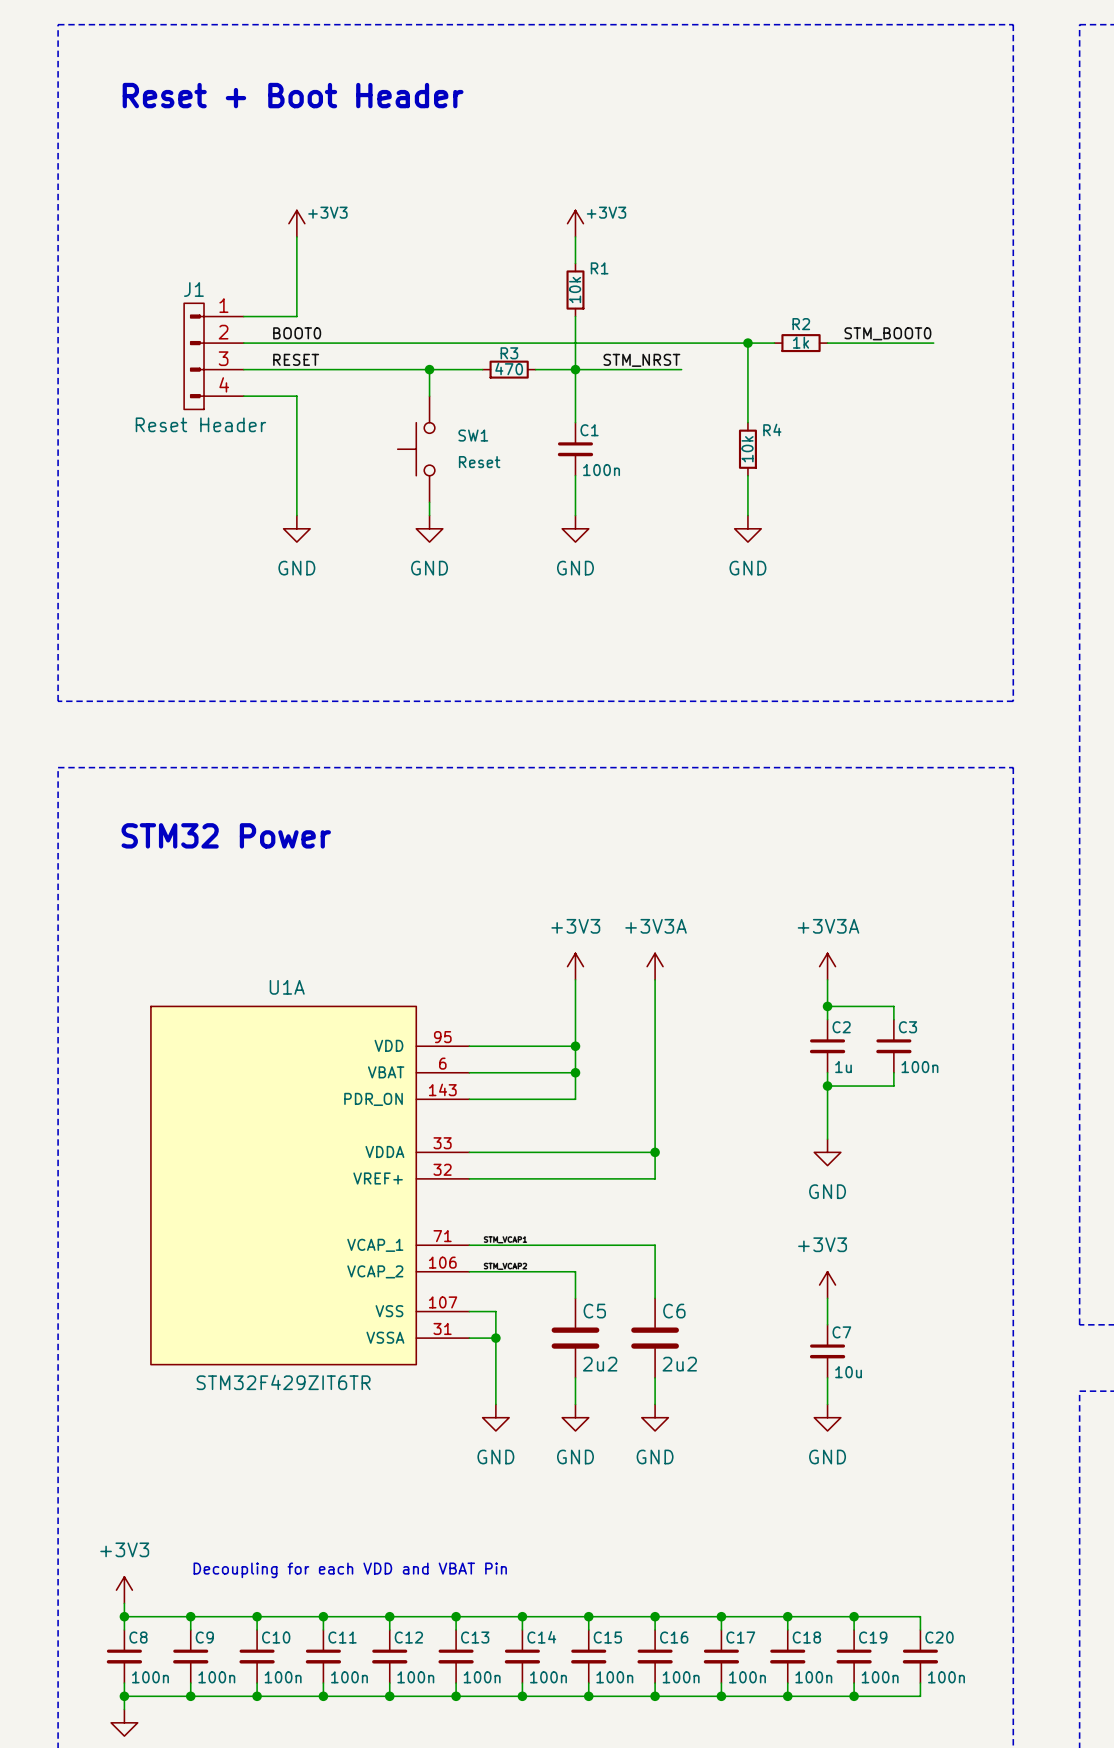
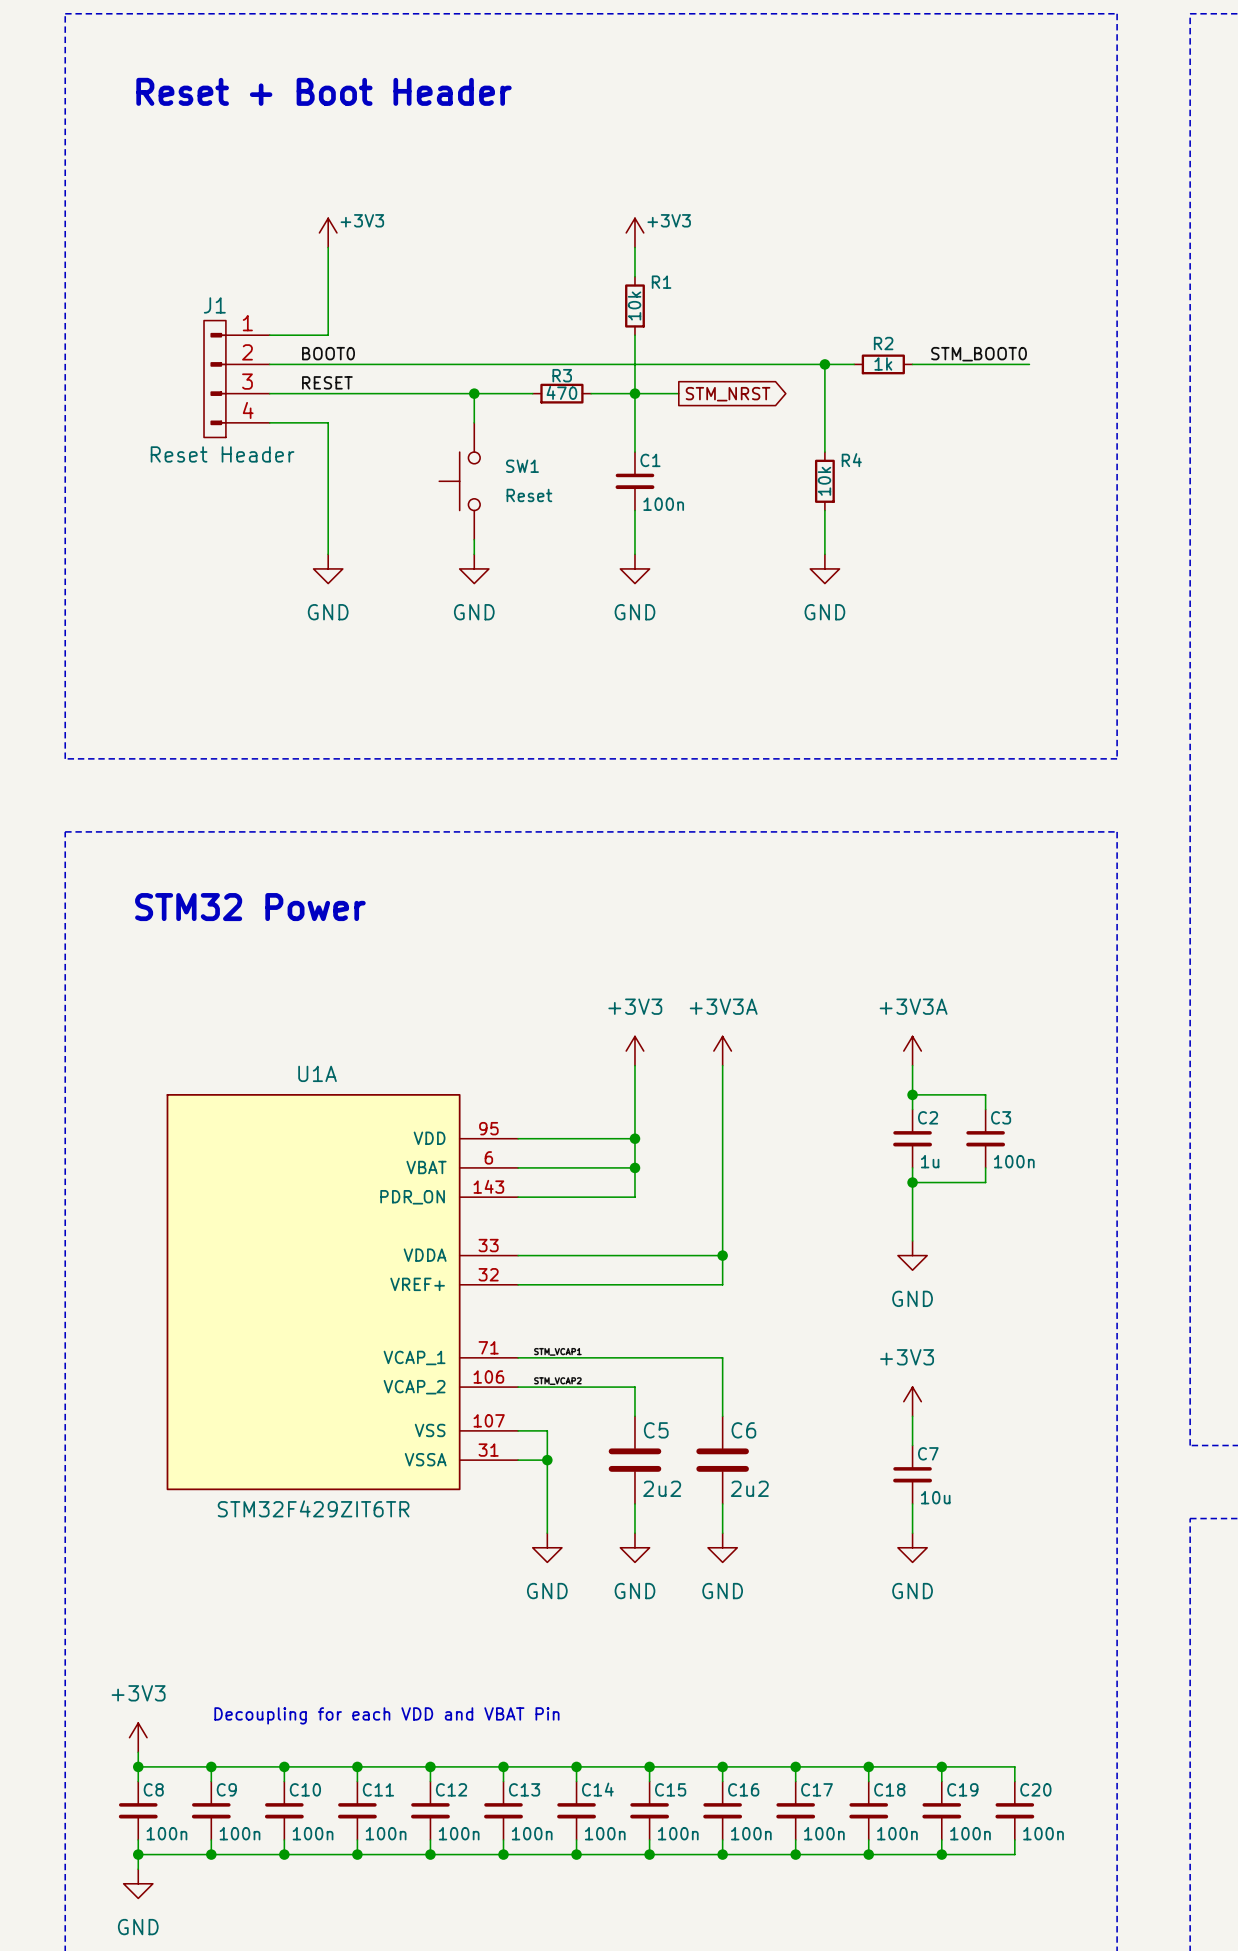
label: STM_NRST (641, 360) -> none
wire: (615, 369) (681, 369) -> none
global label: none -> STM_NRST (728, 394)

